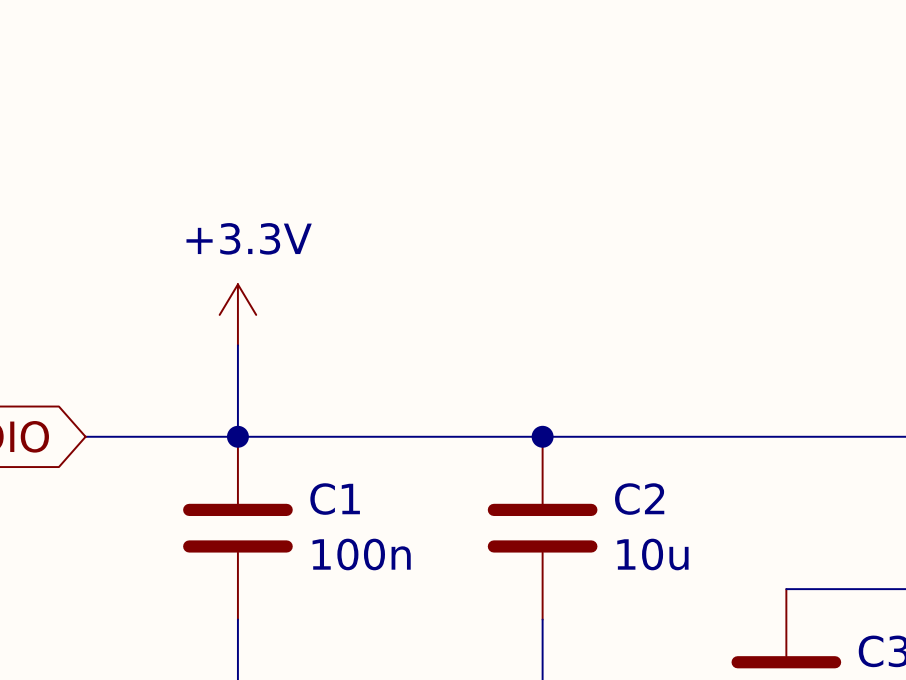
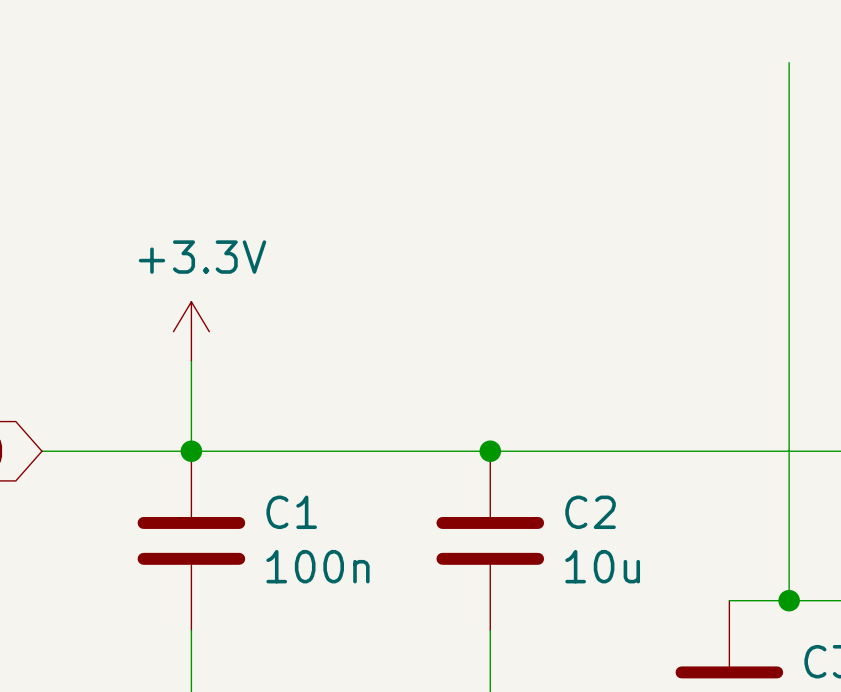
wire: none -> (789, 62) (789, 600)
junction: none -> (789, 600)

